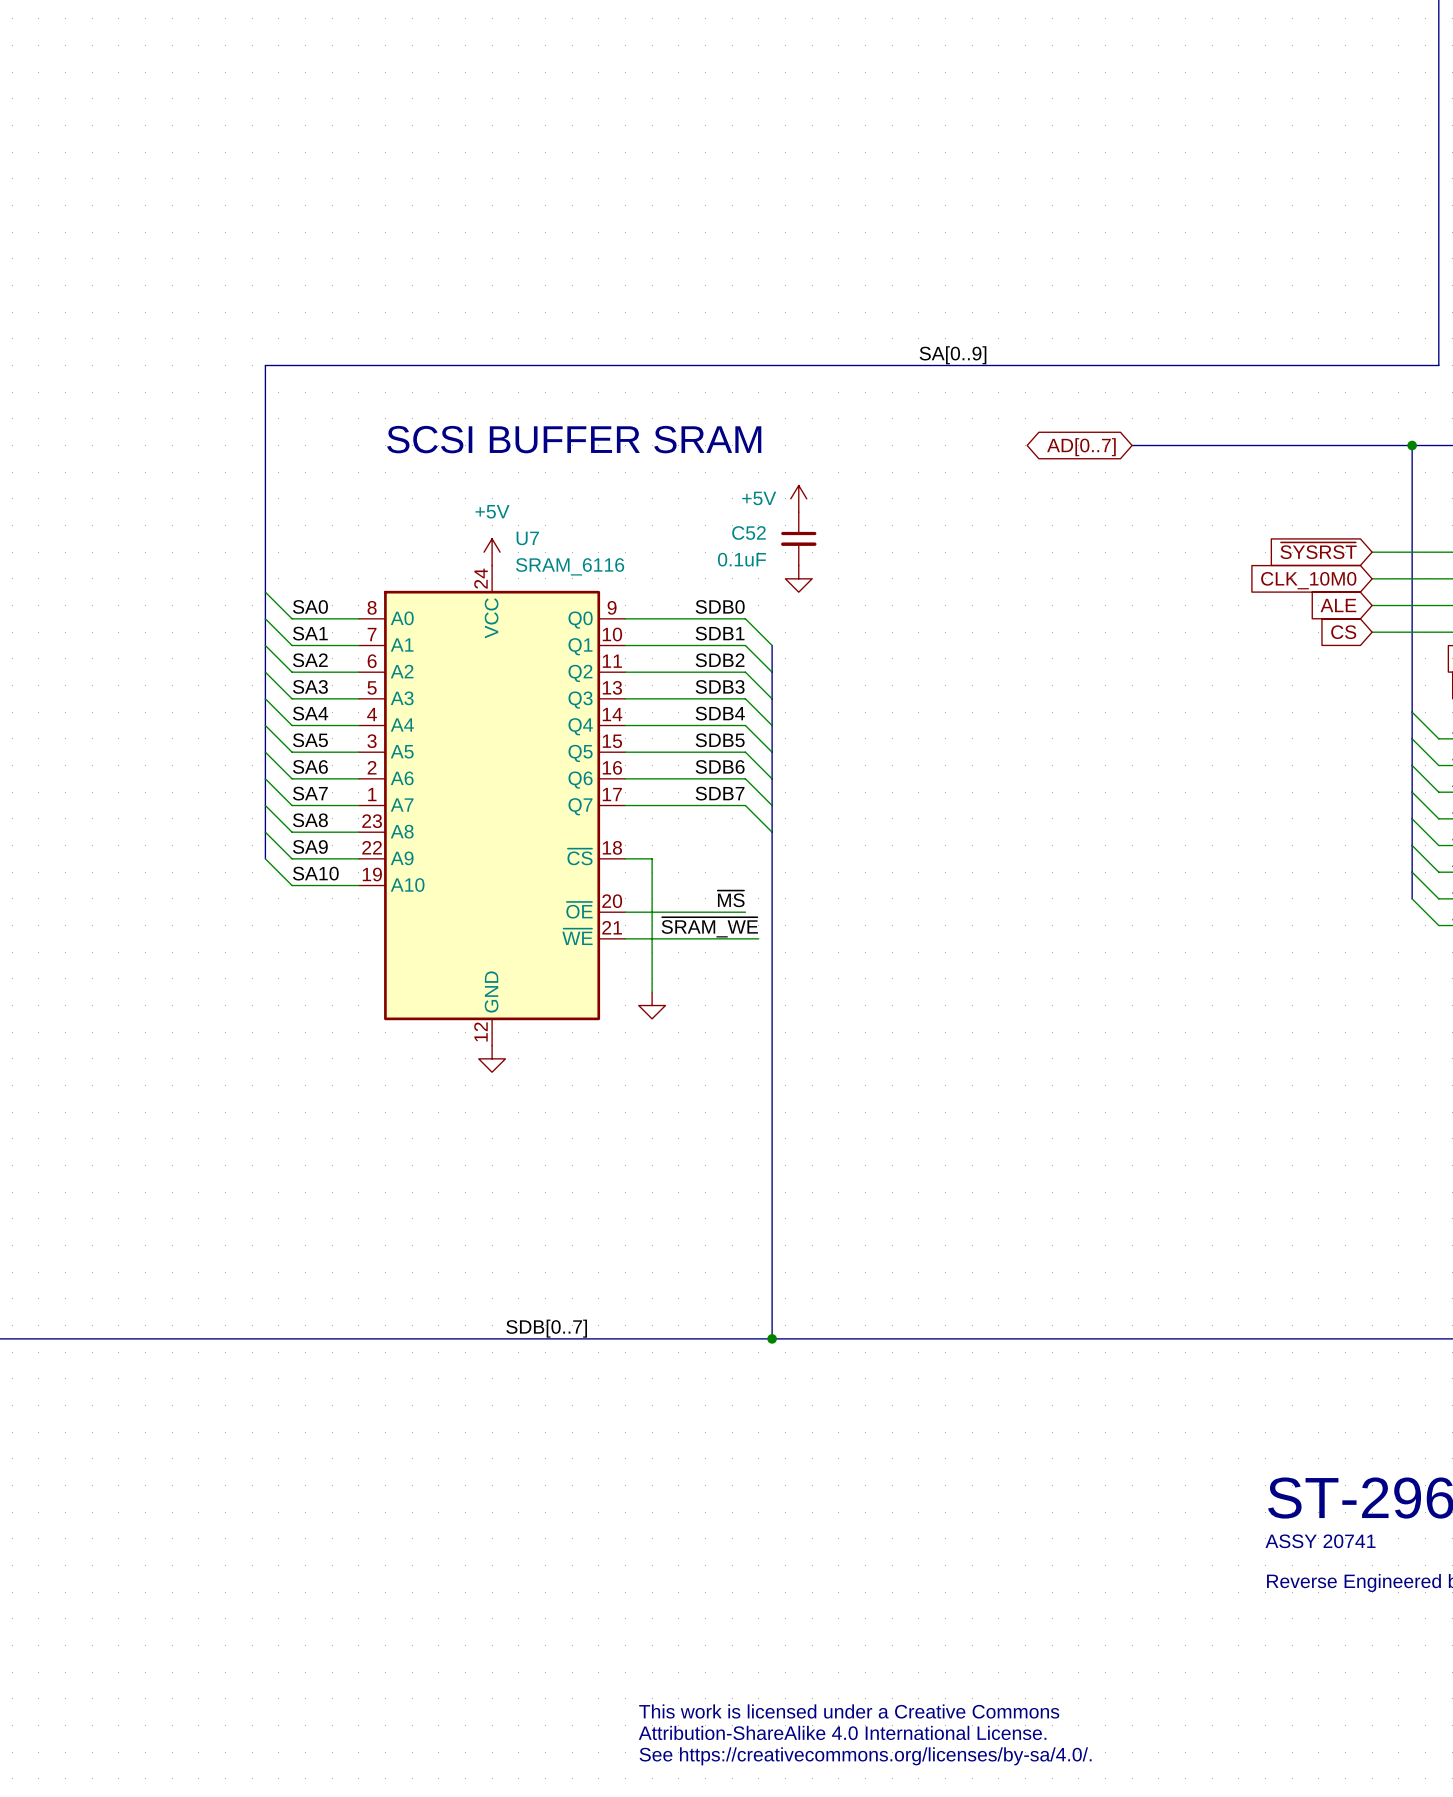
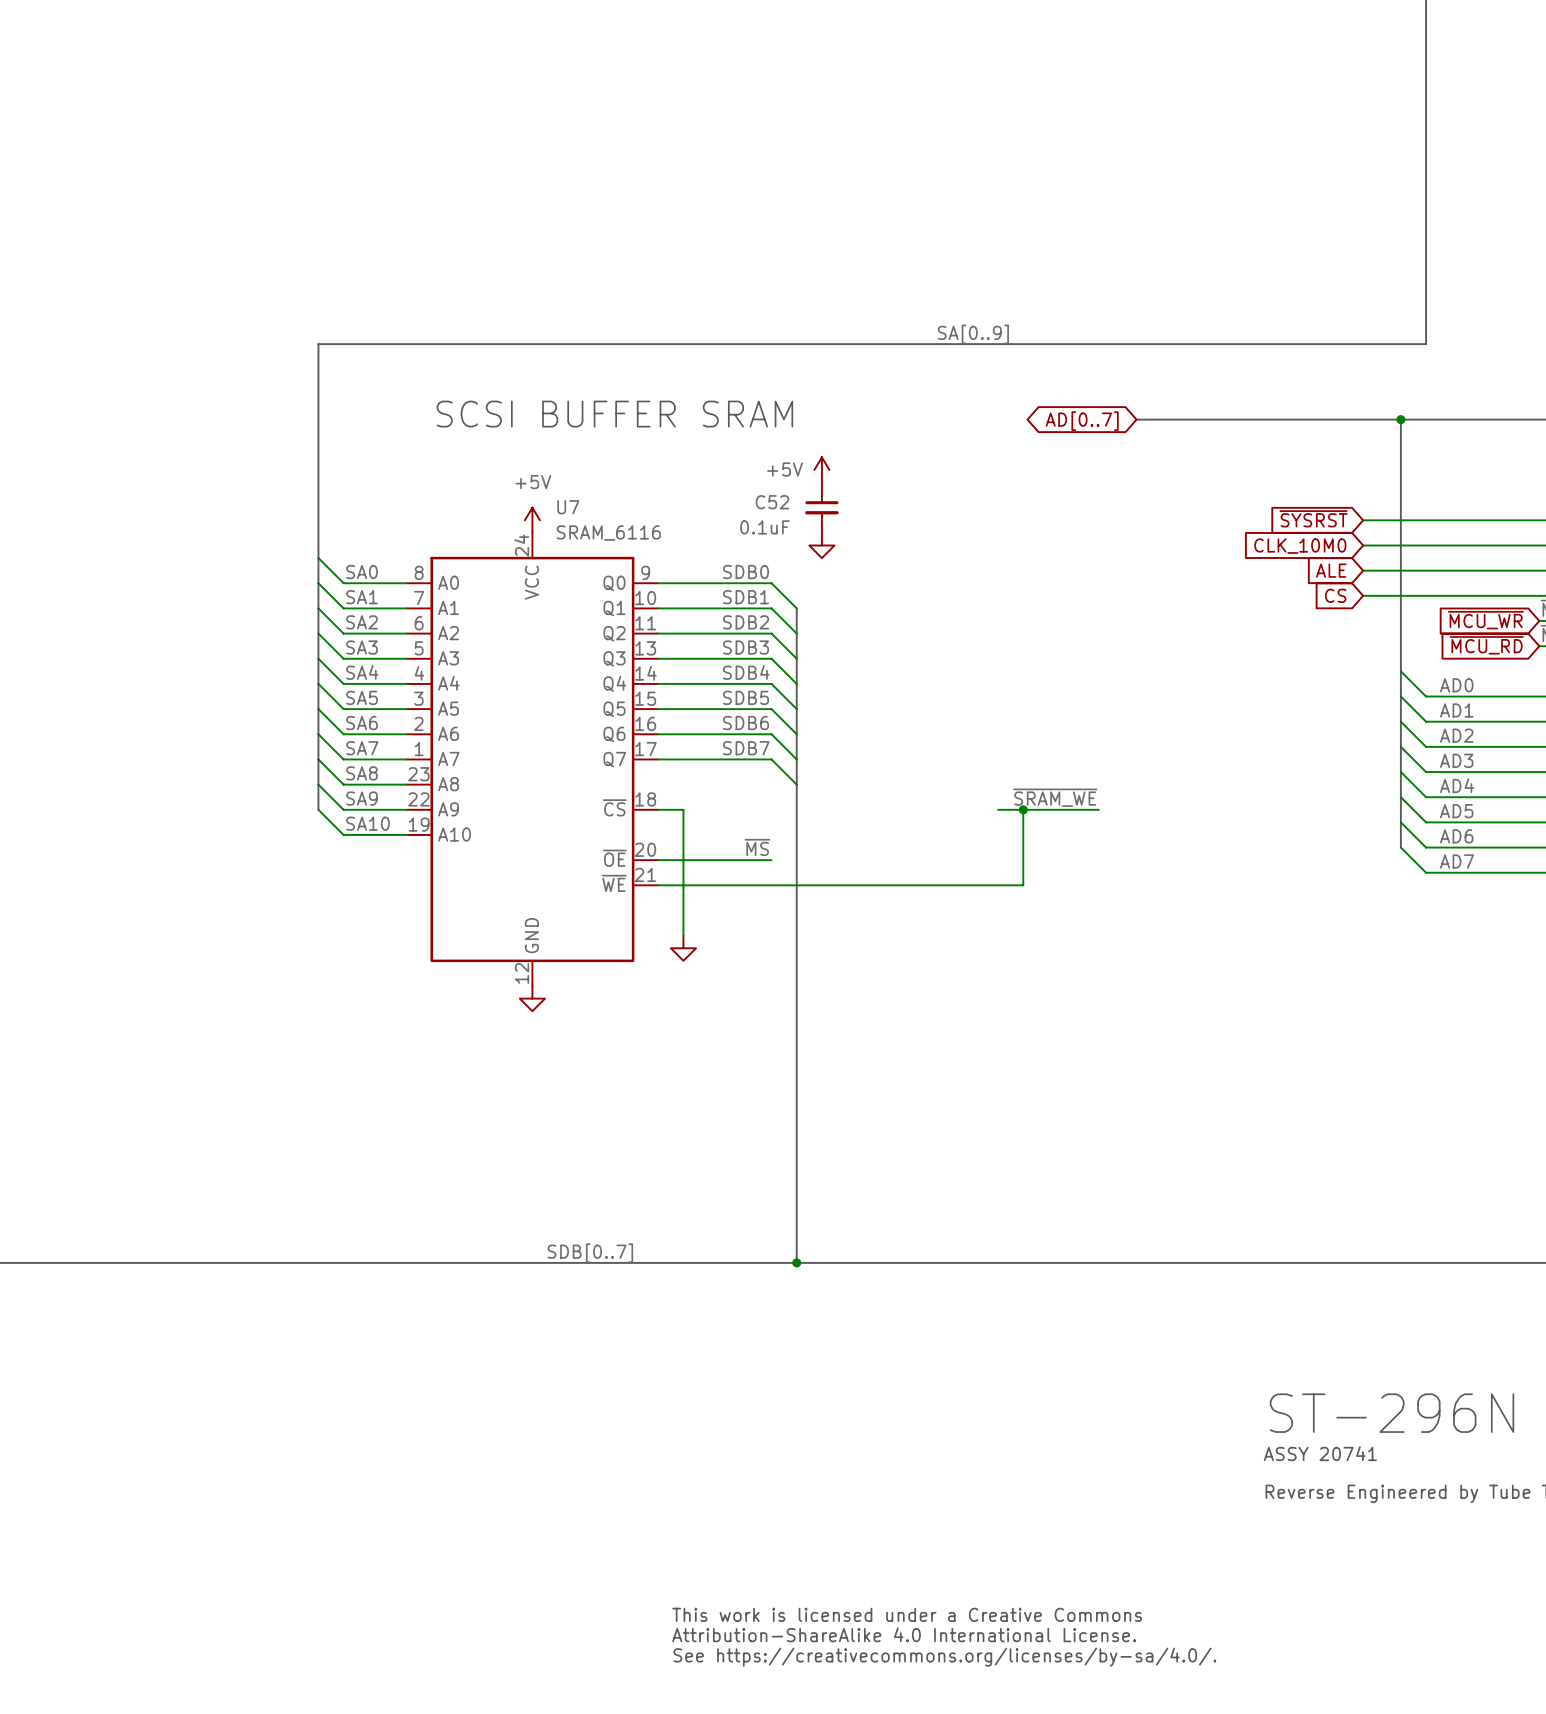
label: none -> ~{SRAM_WE} (1055, 797)
wire: none -> (998, 809) (1098, 809)
wire: none -> (1023, 809) (1023, 885) (784, 885)
junction: none -> (1023, 809)
label: ~{SRAM_WE} (709, 927) -> none

